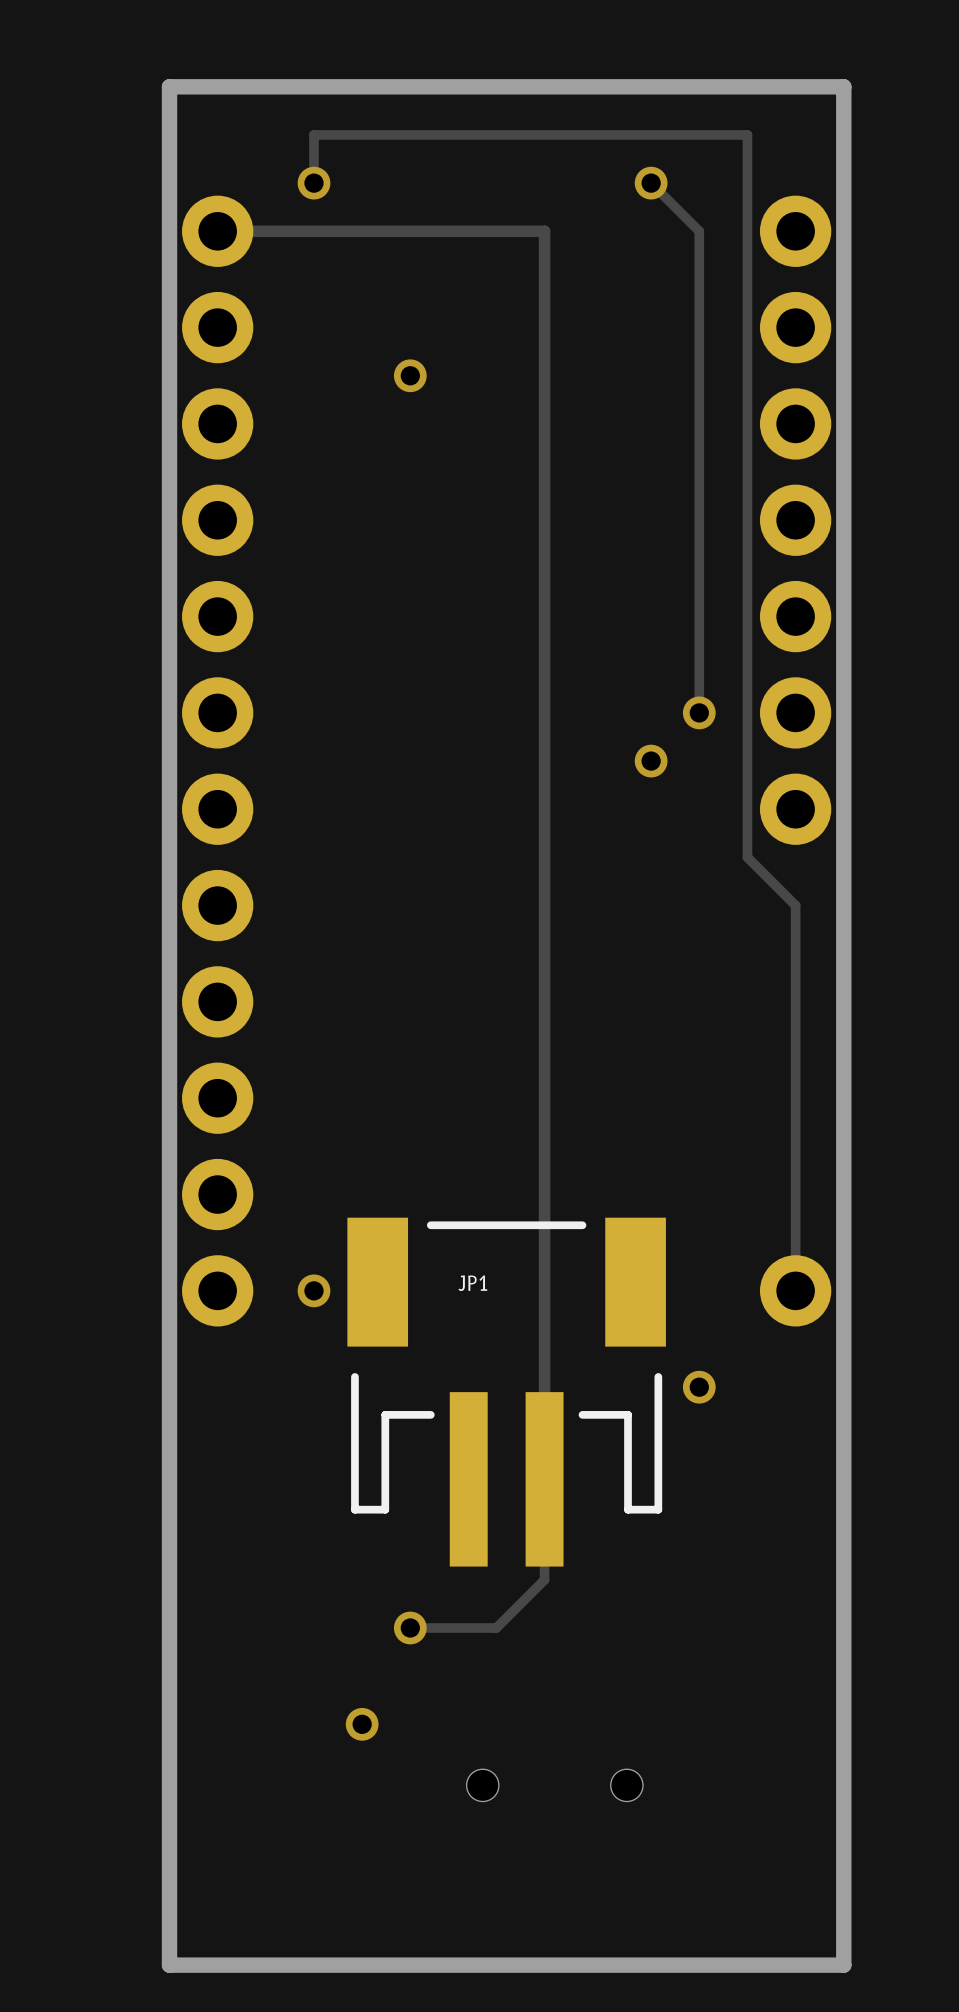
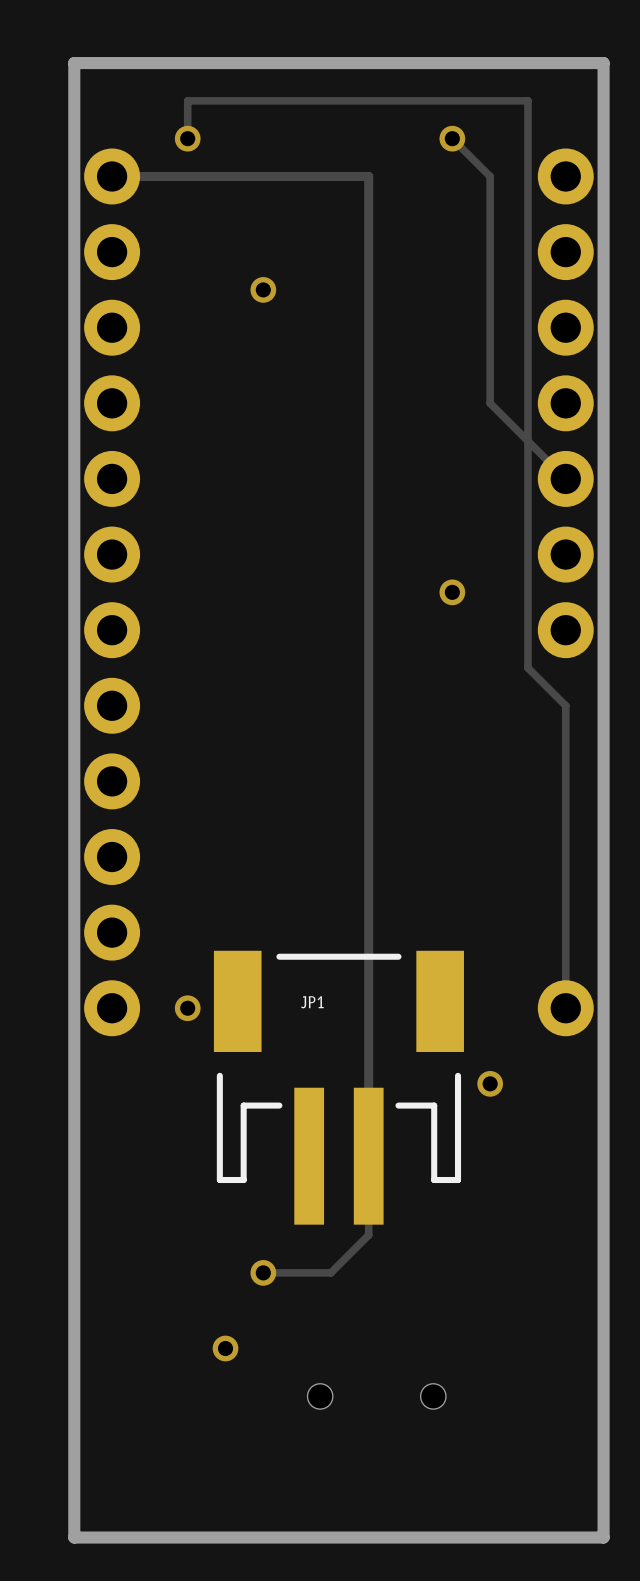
track: (699, 520) (699, 712) -> (490, 403) (565, 478)
via: (699, 712) -> none

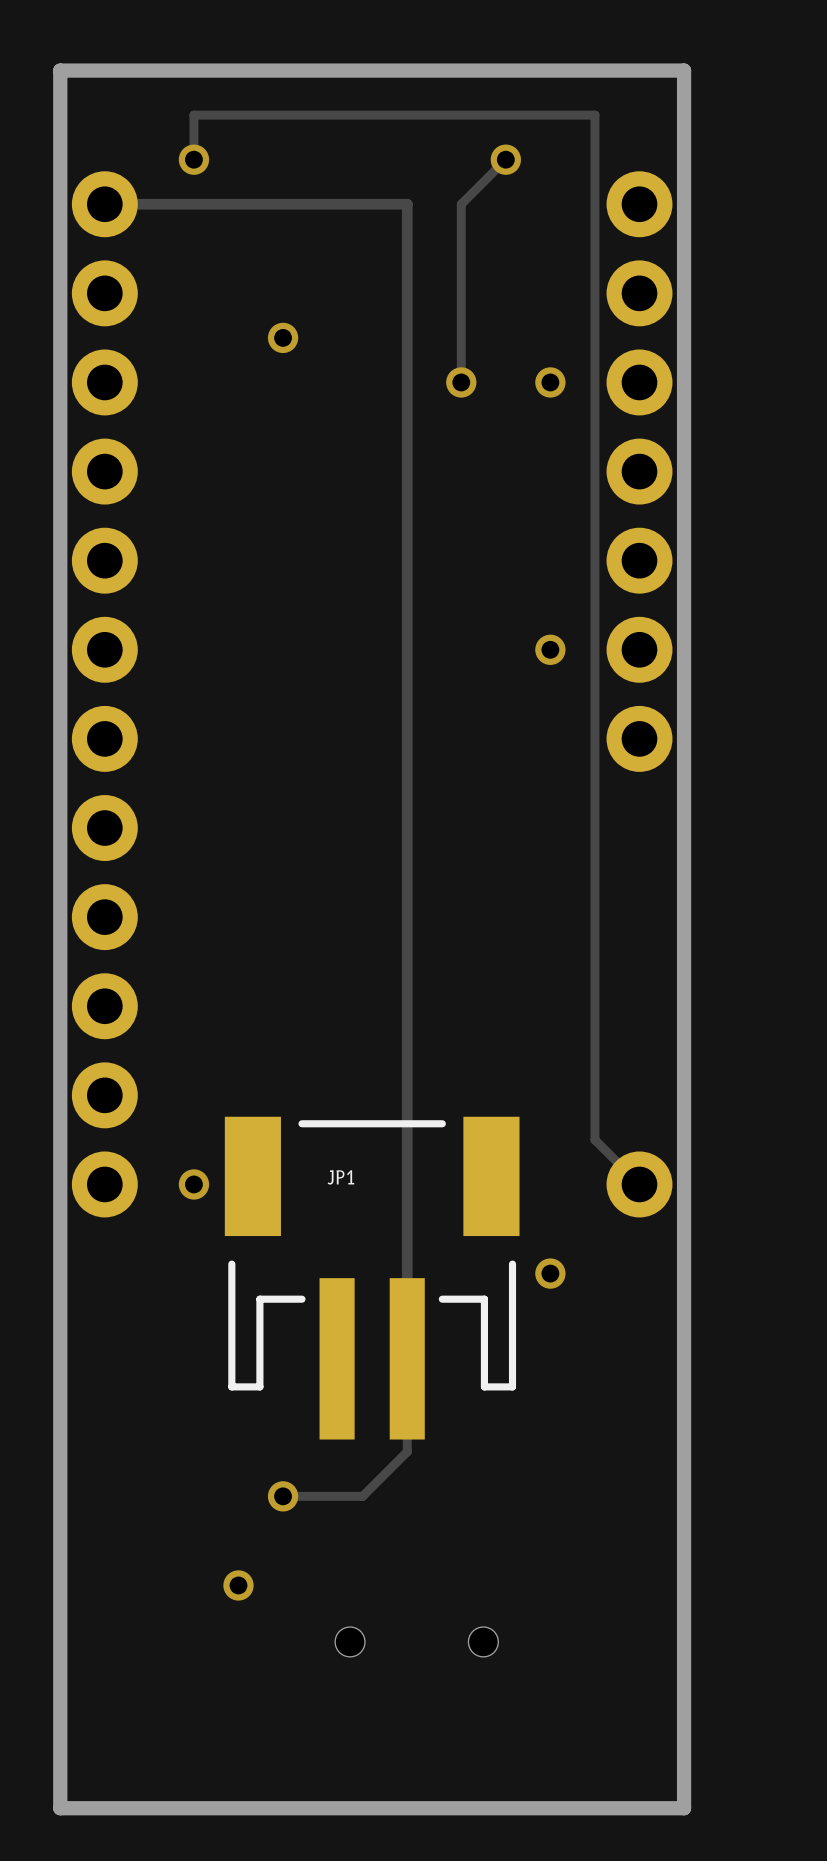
track: (452, 138) (490, 176) (490, 403) (565, 478) -> (505, 159) (461, 204) (461, 382)
via: none -> (461, 382)
via: none -> (550, 382)
via position: (452, 592) -> (550, 649)
track: (527, 667) (565, 705) (565, 1008) -> (594, 783) (594, 1139) (639, 1184)

